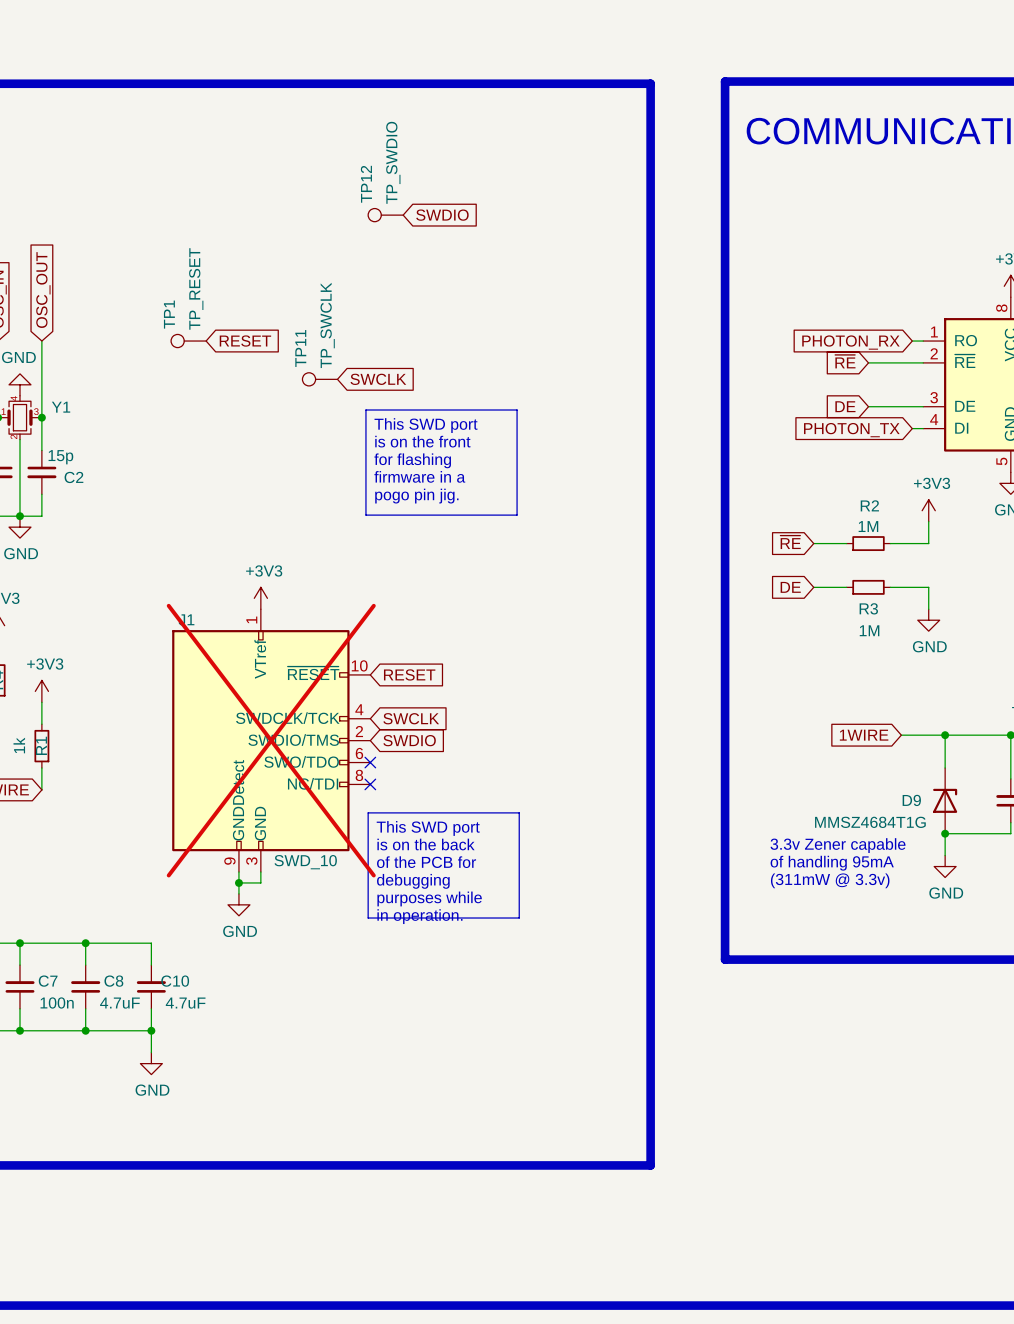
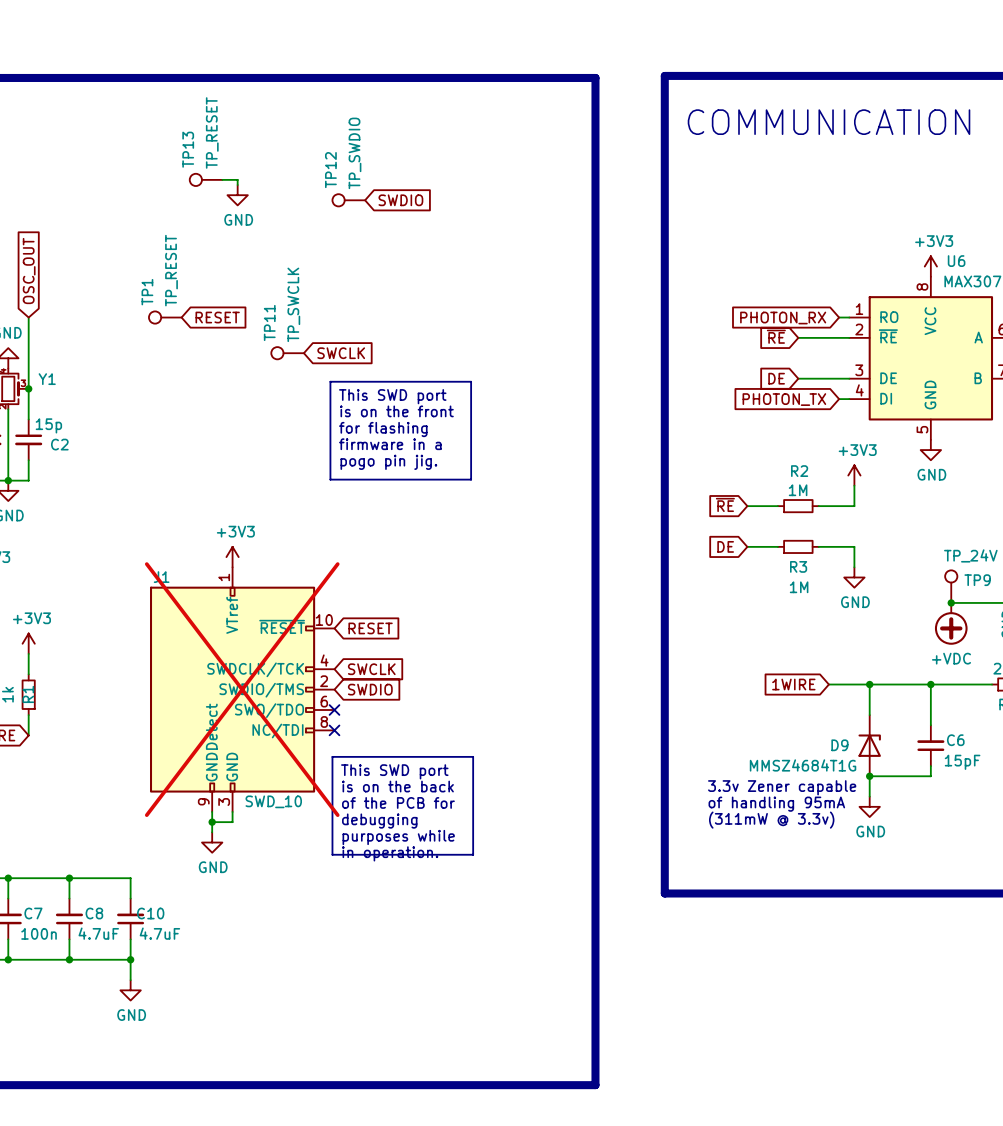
TP13: none -> TP_RESET (206, 179)
wire: none -> (222, 179) (237, 179) (237, 185)
power symbol: none -> GND (237, 195)

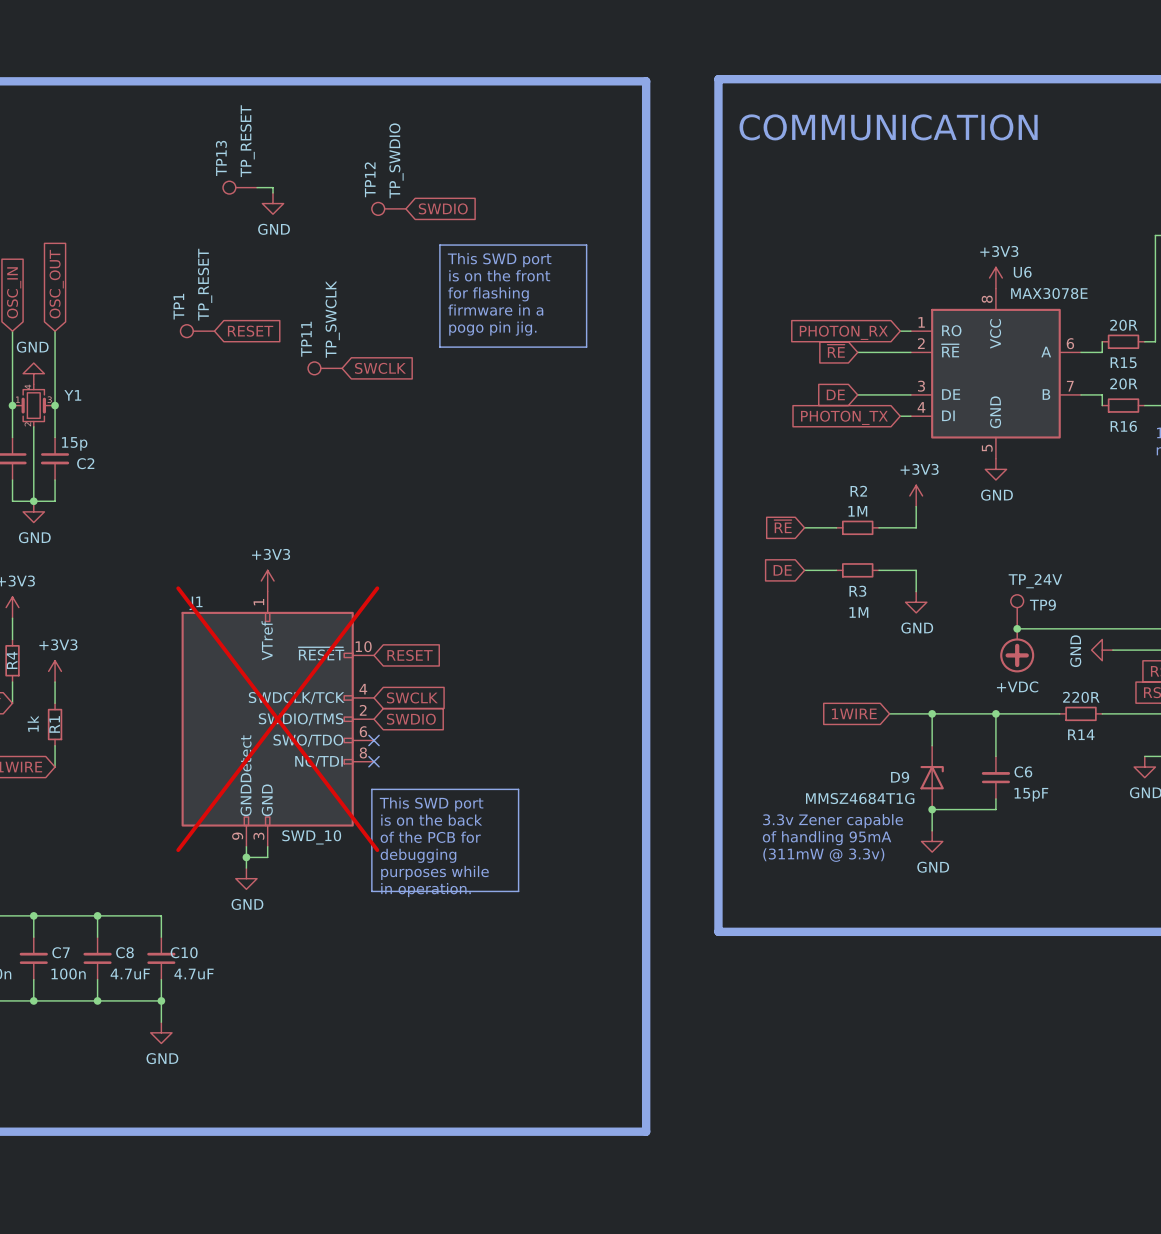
line: (330, 381) (471, 381) (471, 479) (330, 479) (330, 381) -> (439, 245) (586, 245) (586, 347) (439, 347) (439, 245)
text position: This SWD port (392, 396) -> This SWD port (499, 260)
text position: is on the front (396, 411) -> is on the front (499, 275)
text position: for flashing (383, 429) -> for flashing (488, 294)
text position: firmware in a (390, 444) -> firmware in a (495, 310)
text position: pogo pin jig. (388, 462) -> pogo pin jig. (492, 328)

